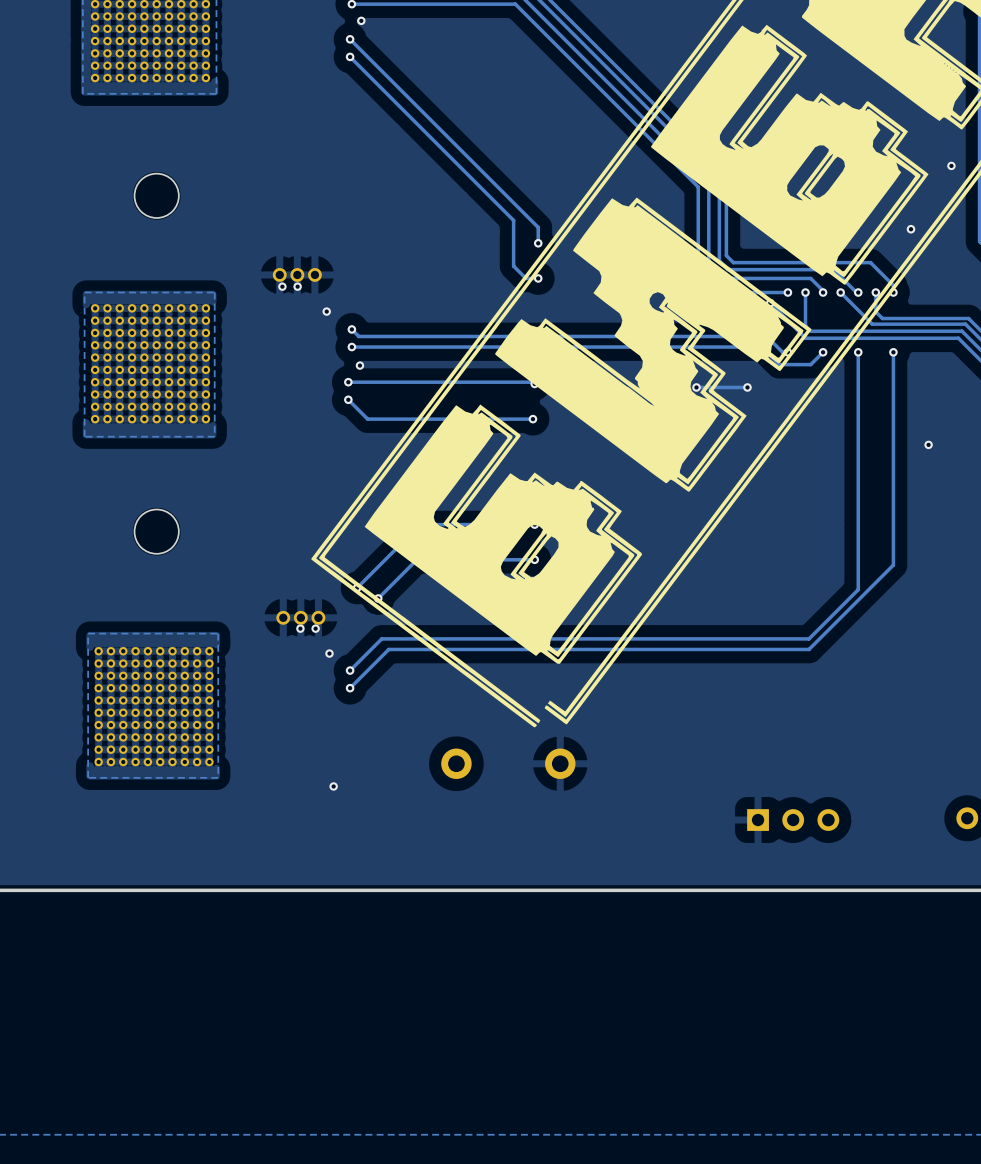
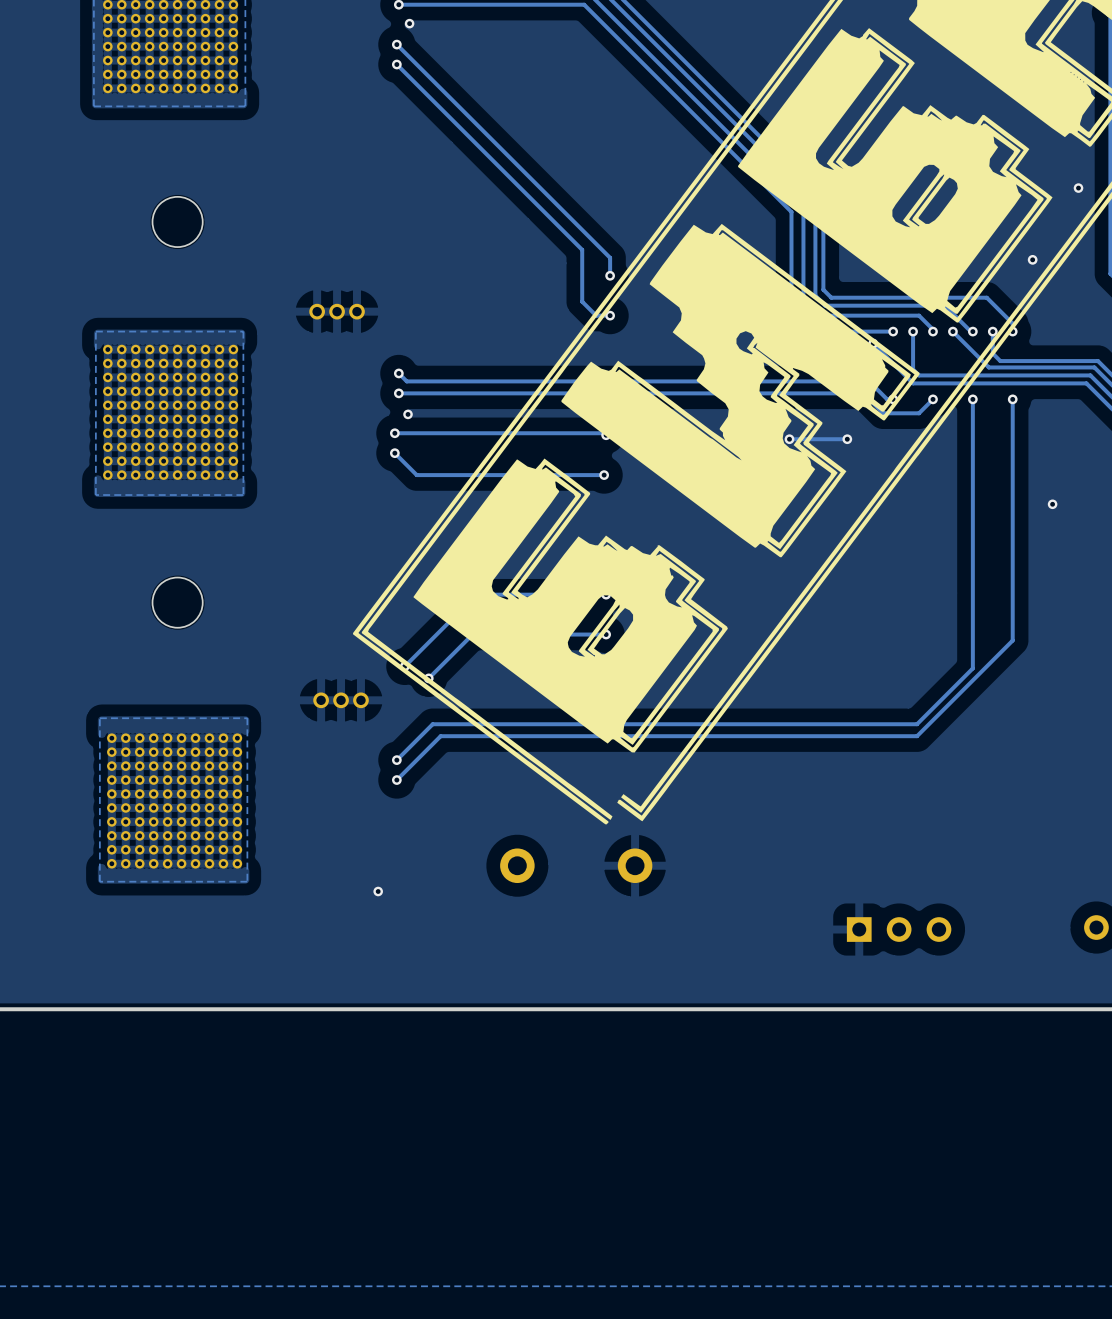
via: (282, 286) -> none
via: (297, 286) -> none
via: (326, 311) -> none
via: (300, 628) -> none
via: (315, 628) -> none
via: (329, 653) -> none

